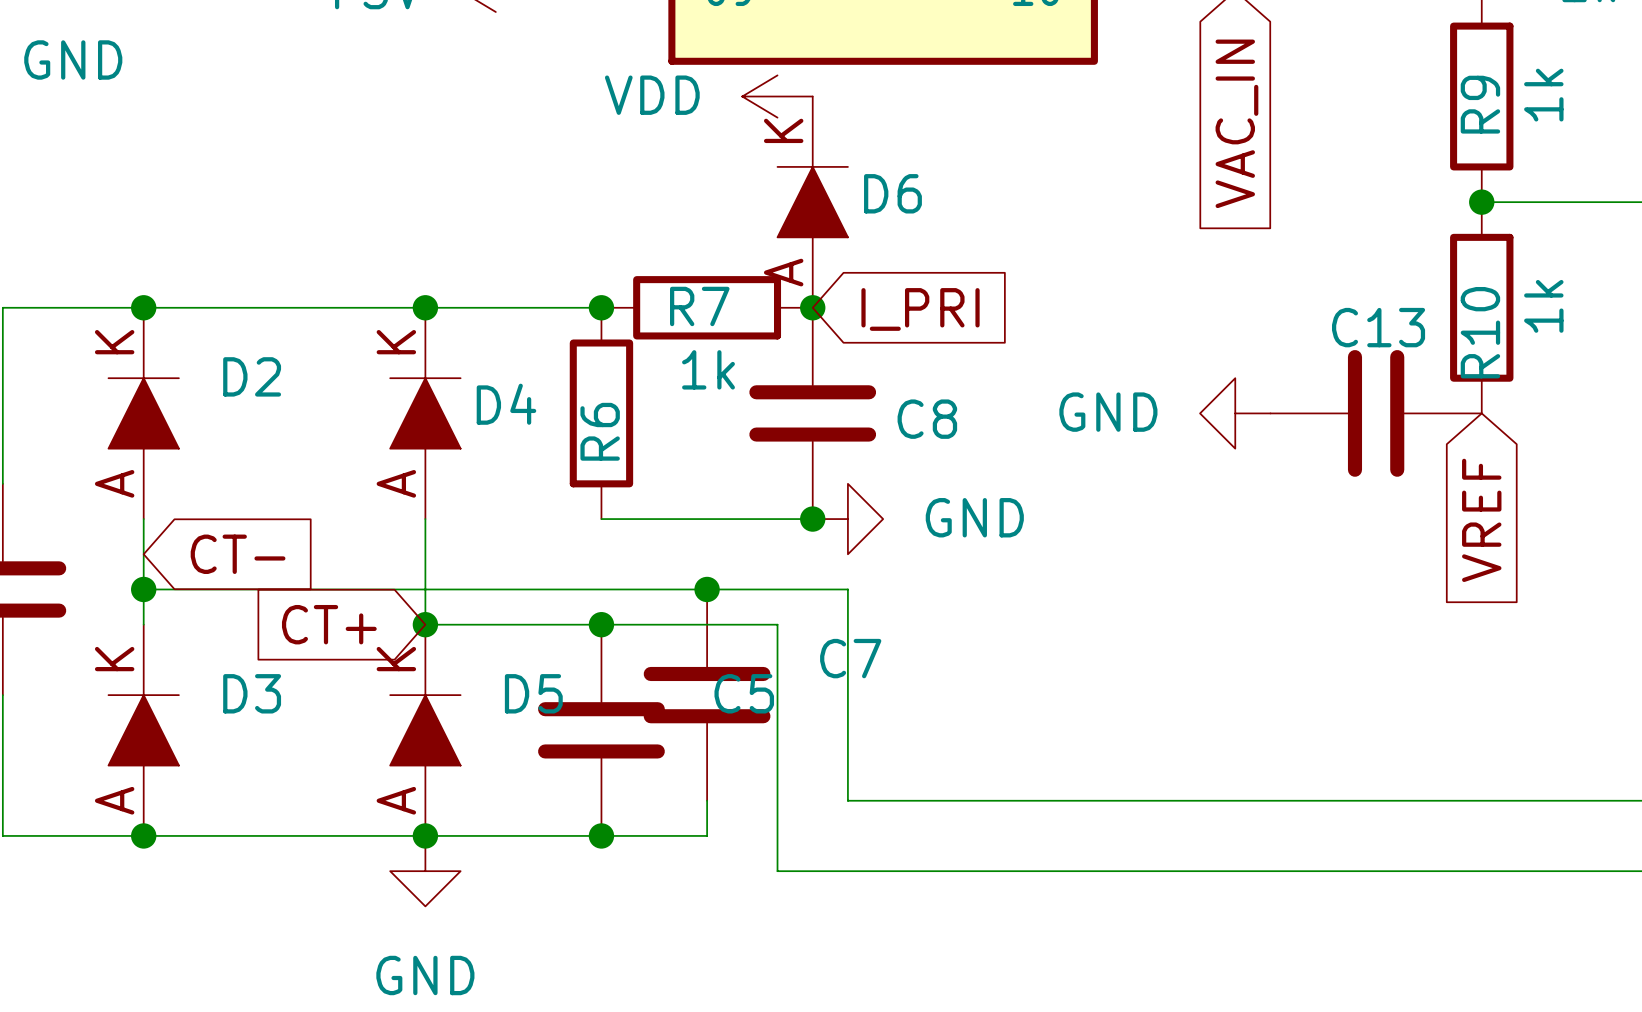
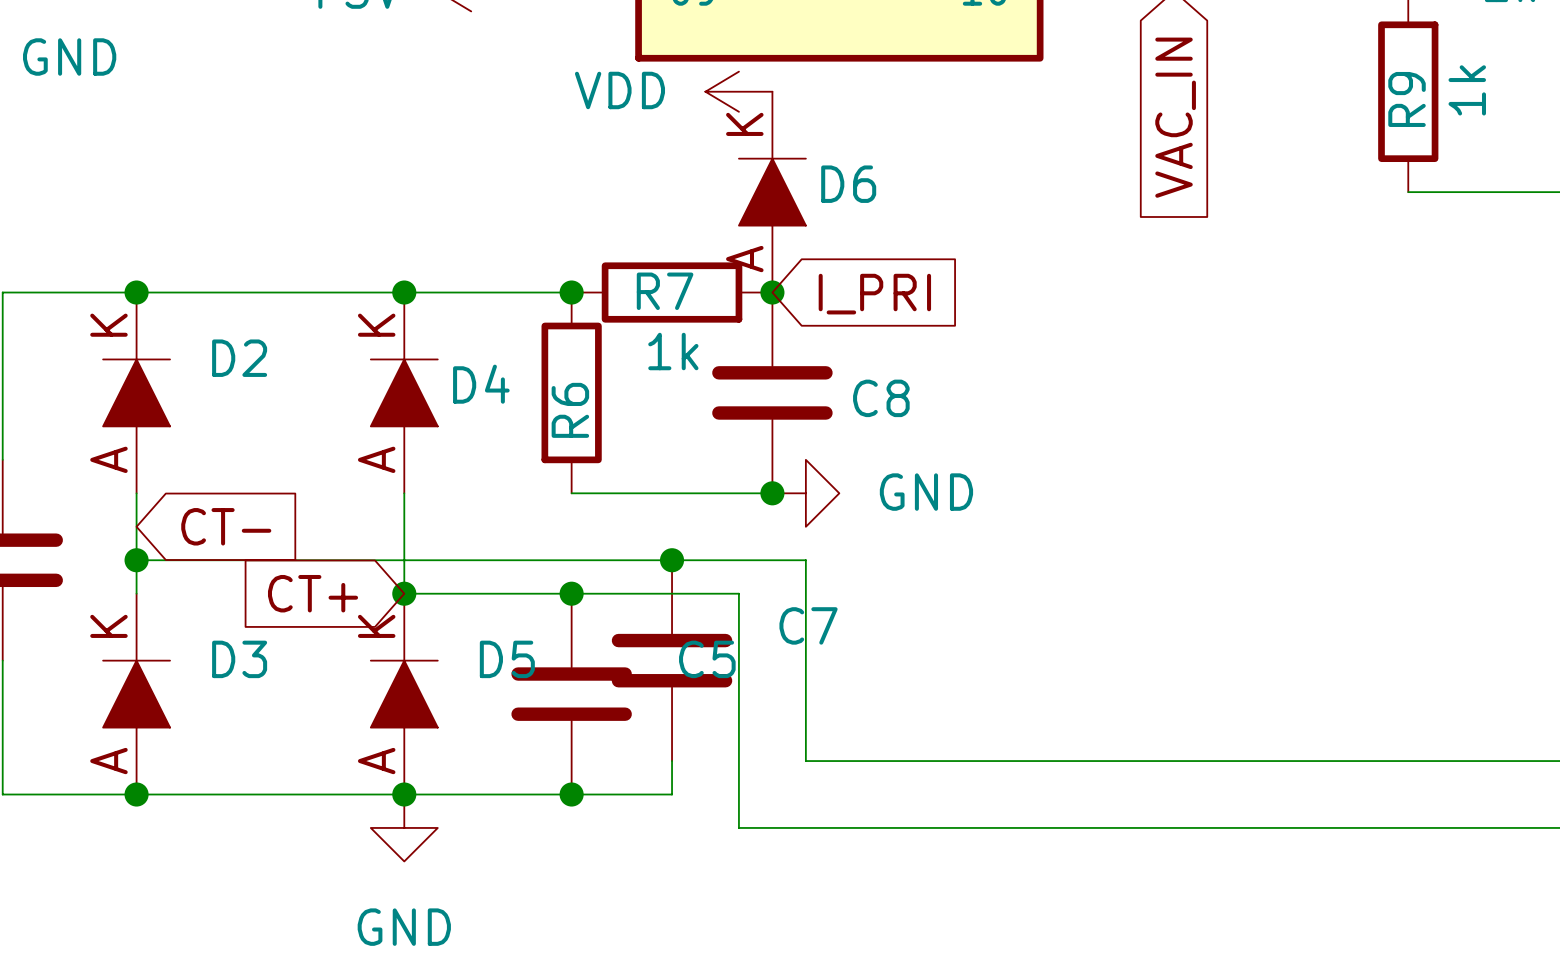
junction: (1481, 202) -> none
R10: 1k (1481, 307) -> none
power symbol: GND (1235, 413) -> none
C13: (1376, 413) -> none
global label: VREF (1481, 520) -> none

